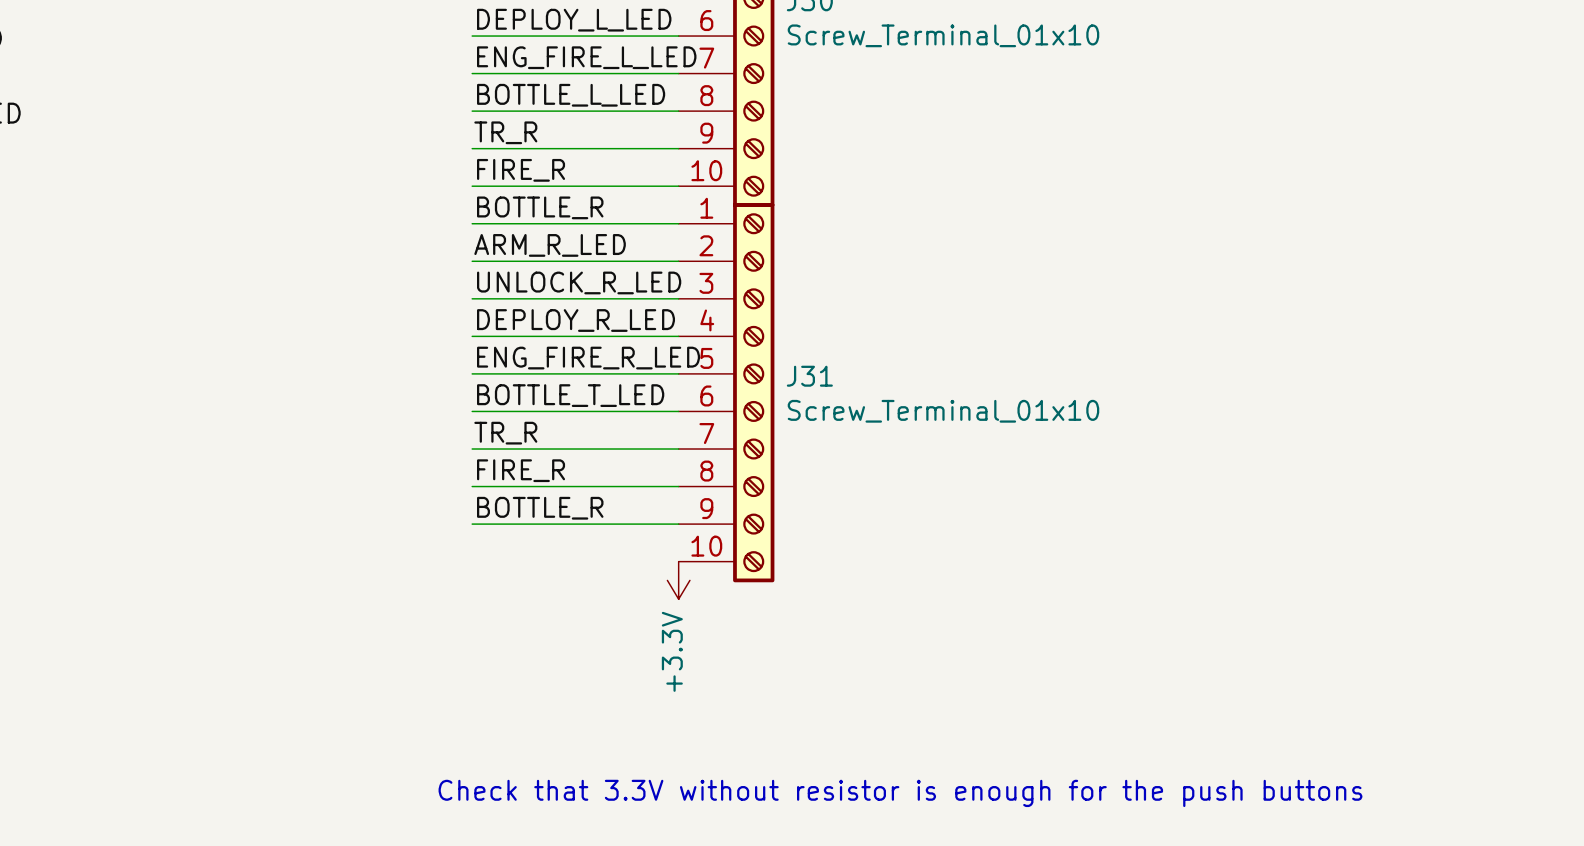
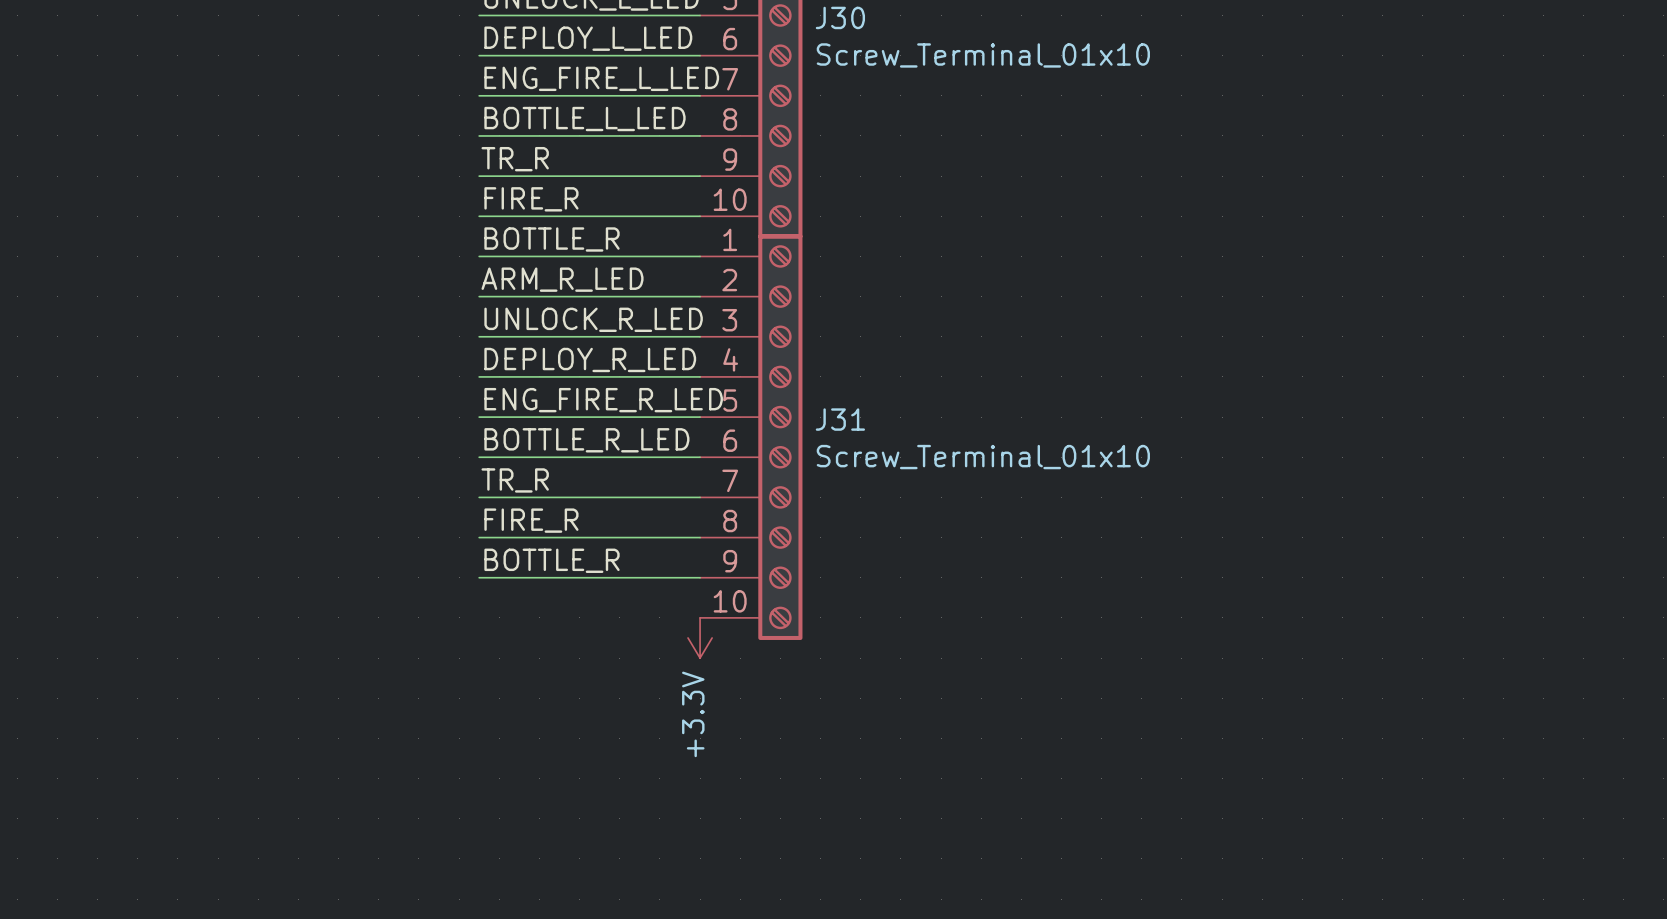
label: BOTTLE_T_LED (570, 395) -> BOTTLE_R_LED (586, 440)
text: Check that 3.3V without resistor is enough for the push buttons (900, 793) -> none

